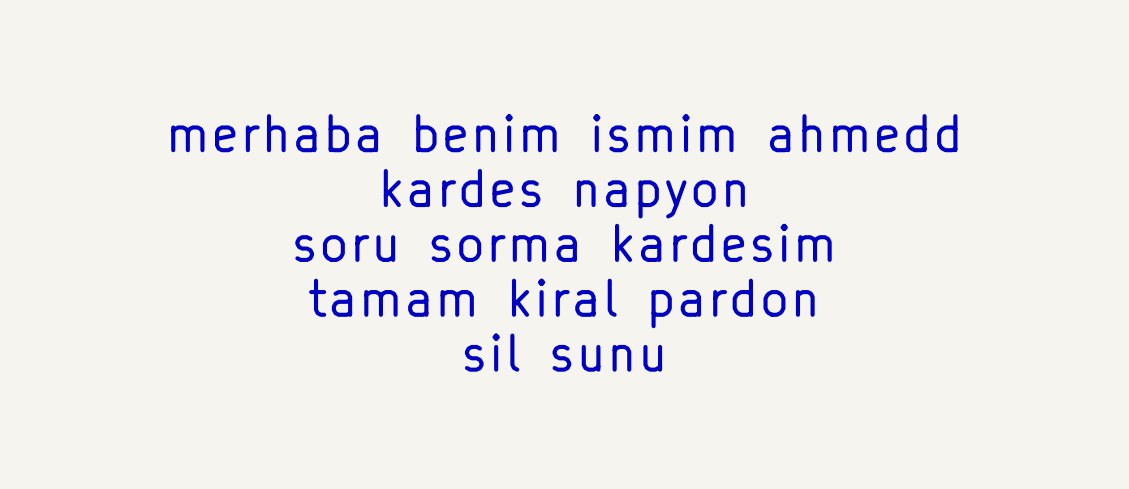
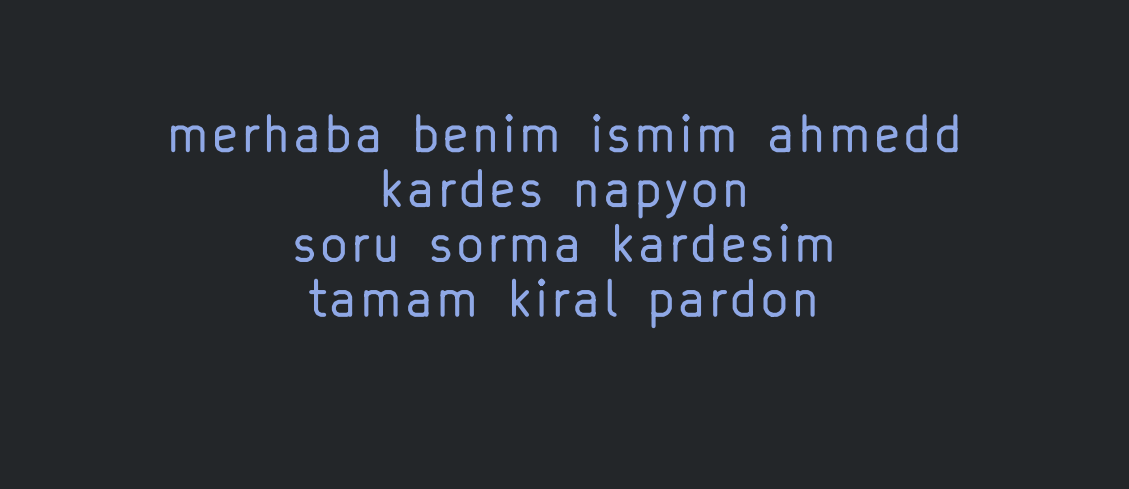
text: sil sunu (563, 352) -> none

